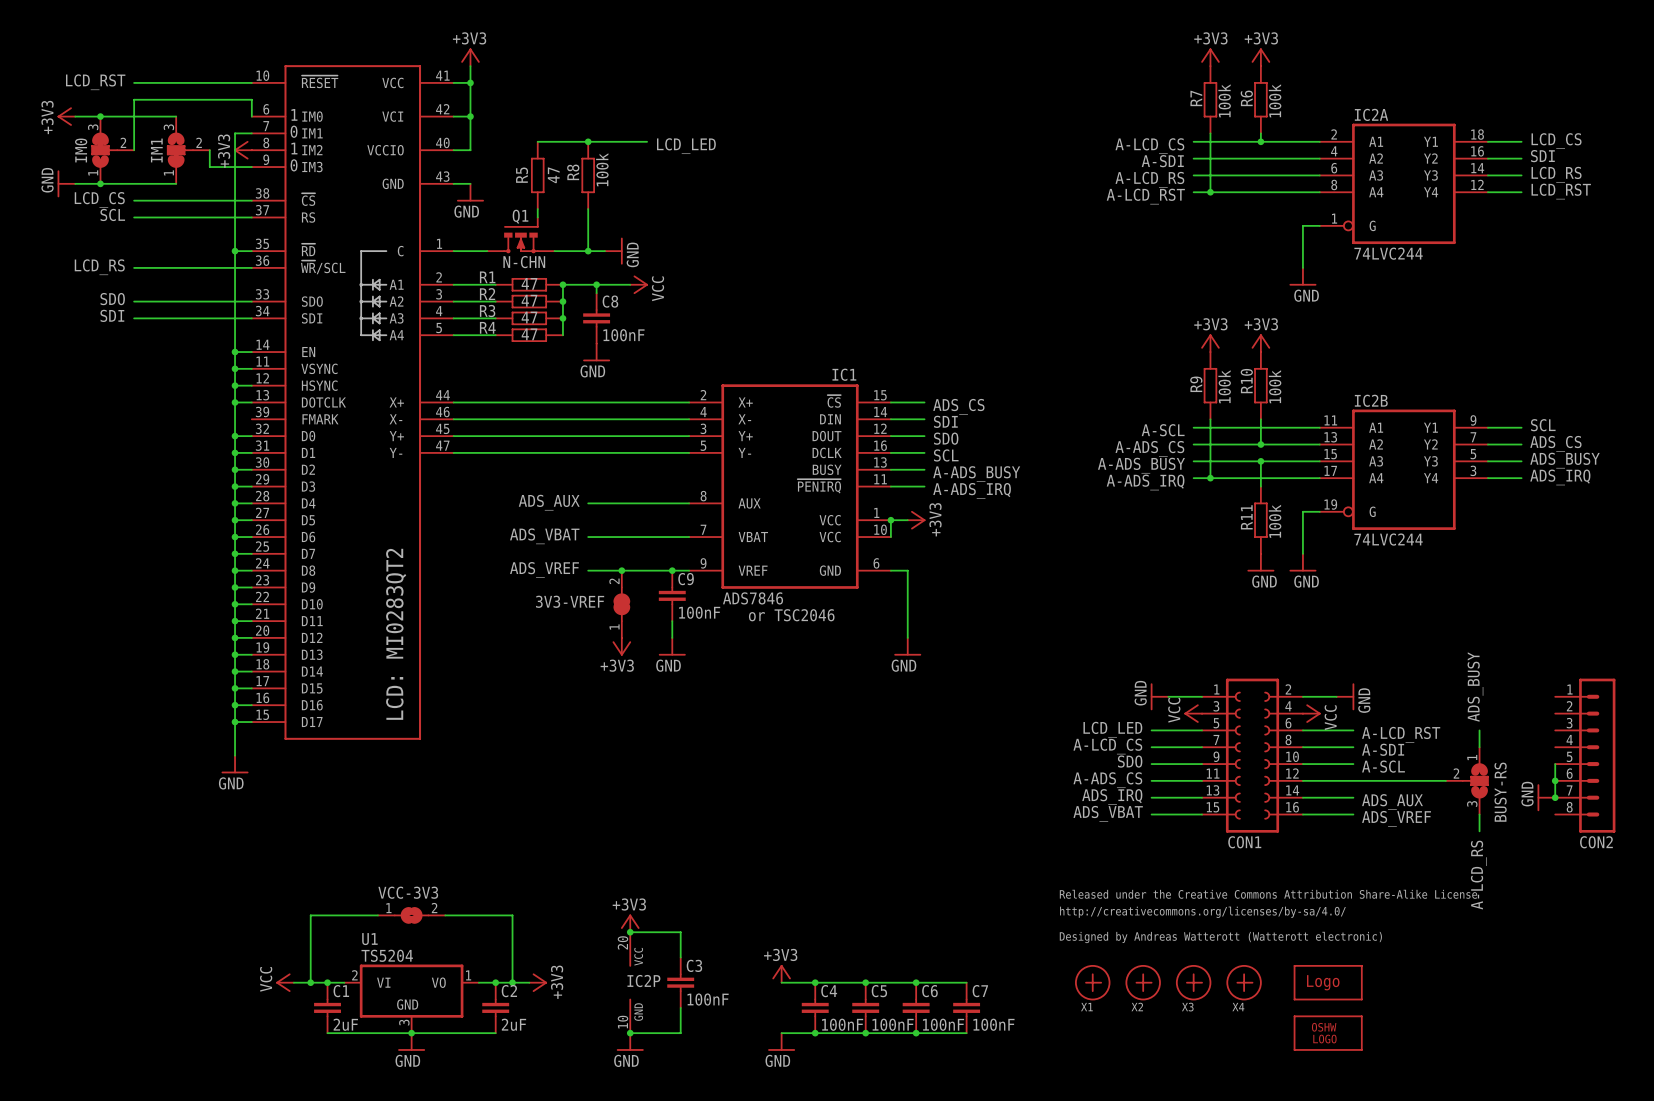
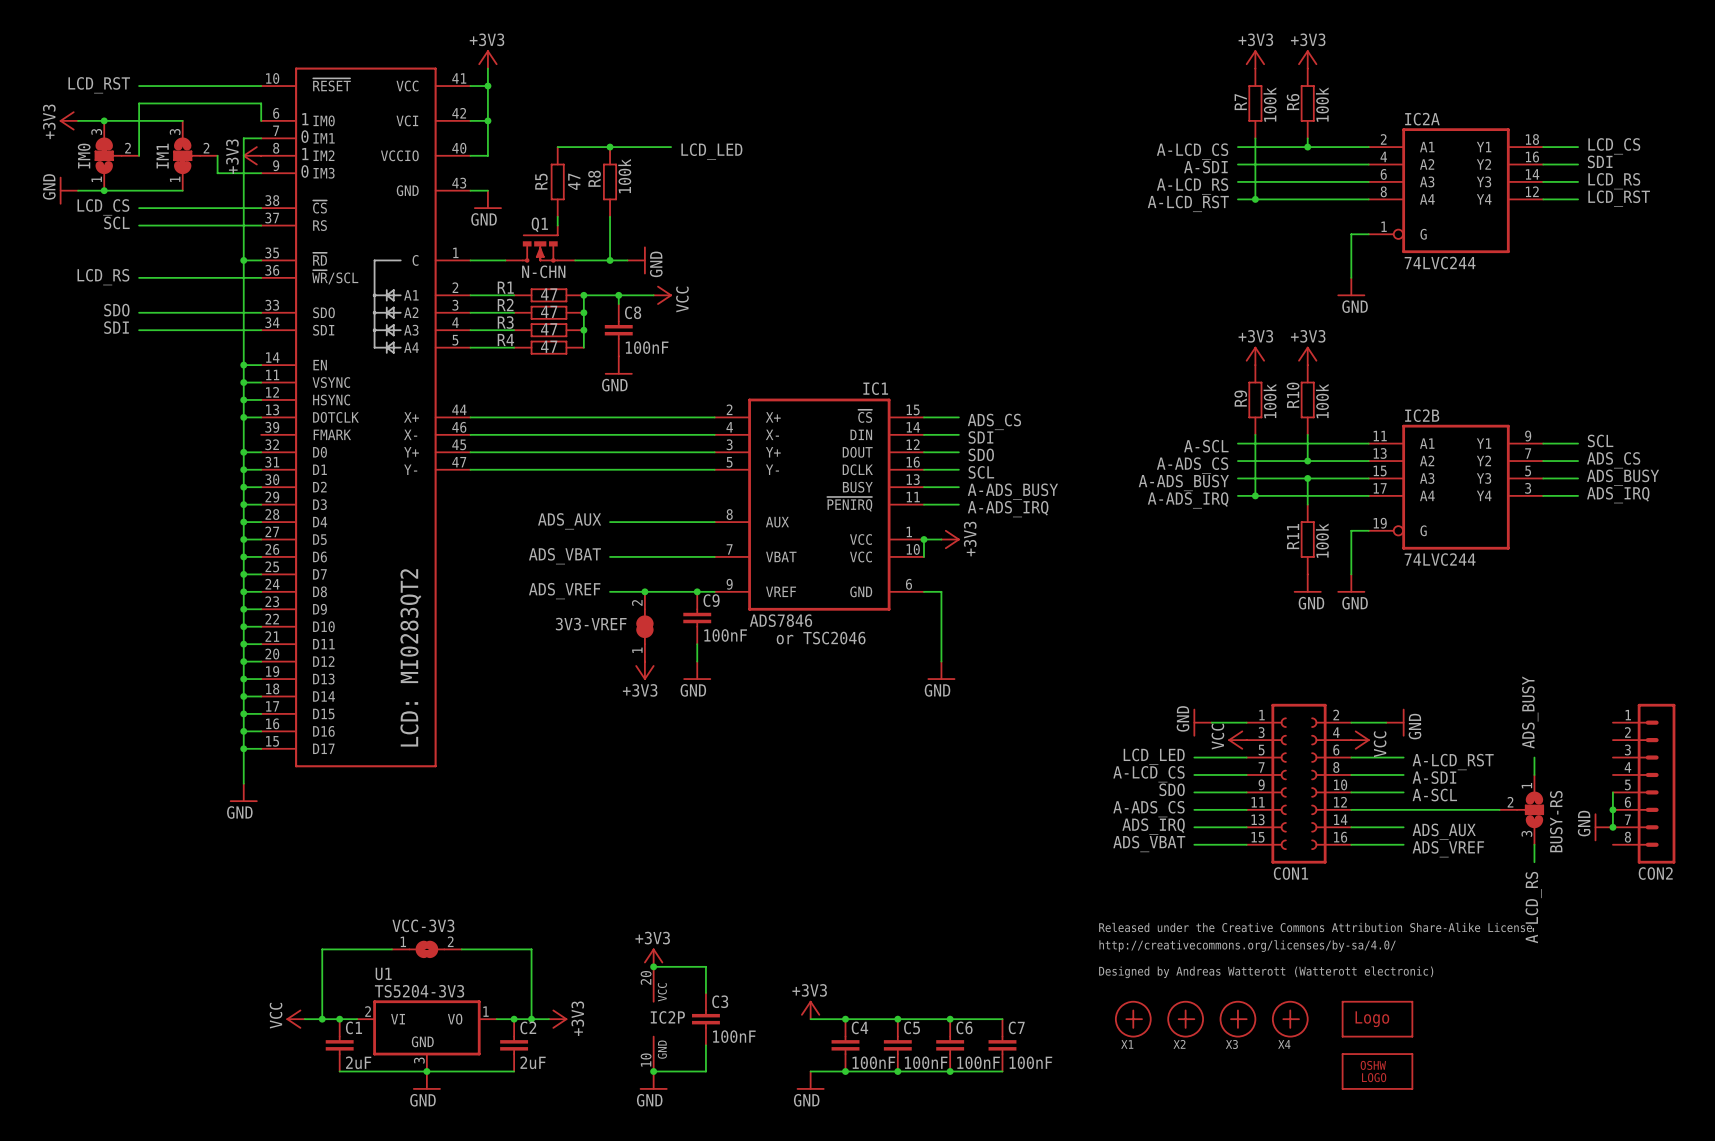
U1 value: TS5204 (387, 955) -> TS5204-3V3 (419, 991)

